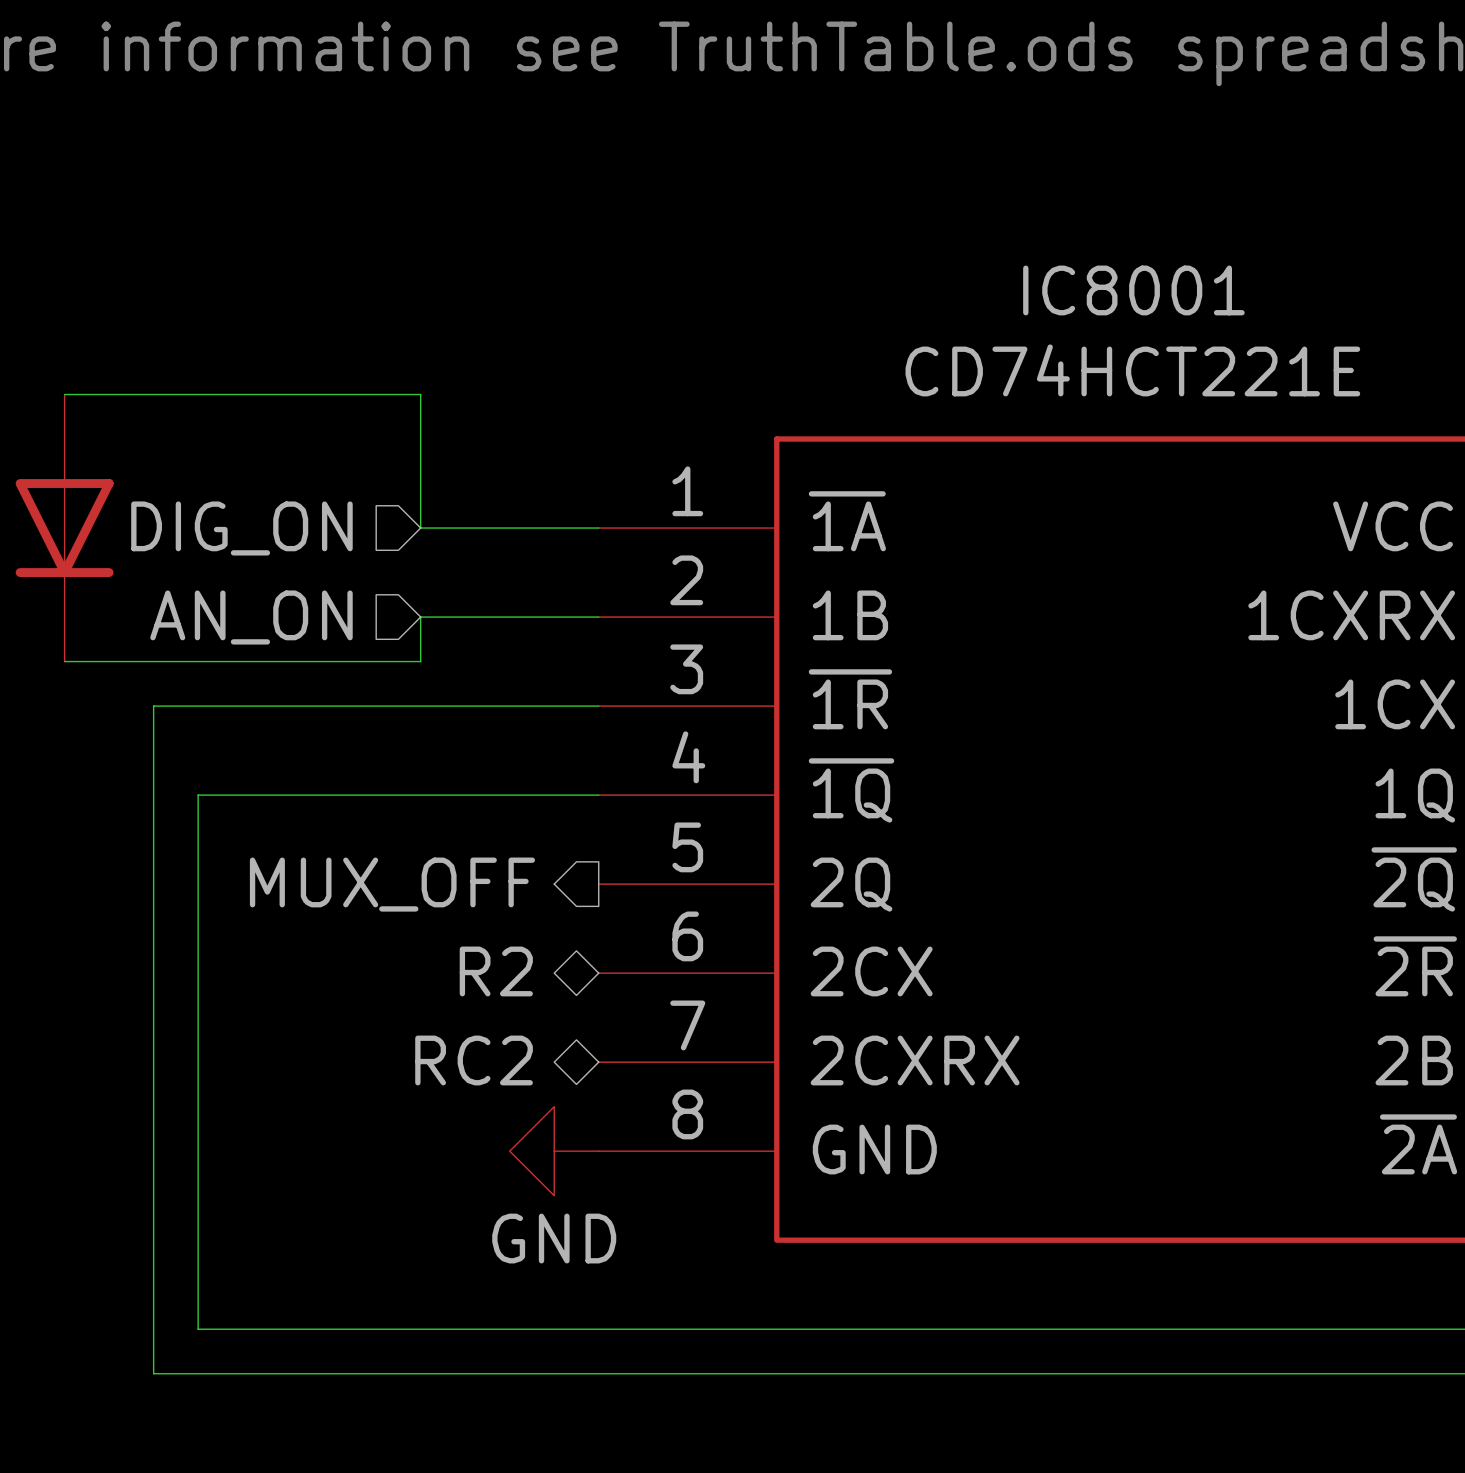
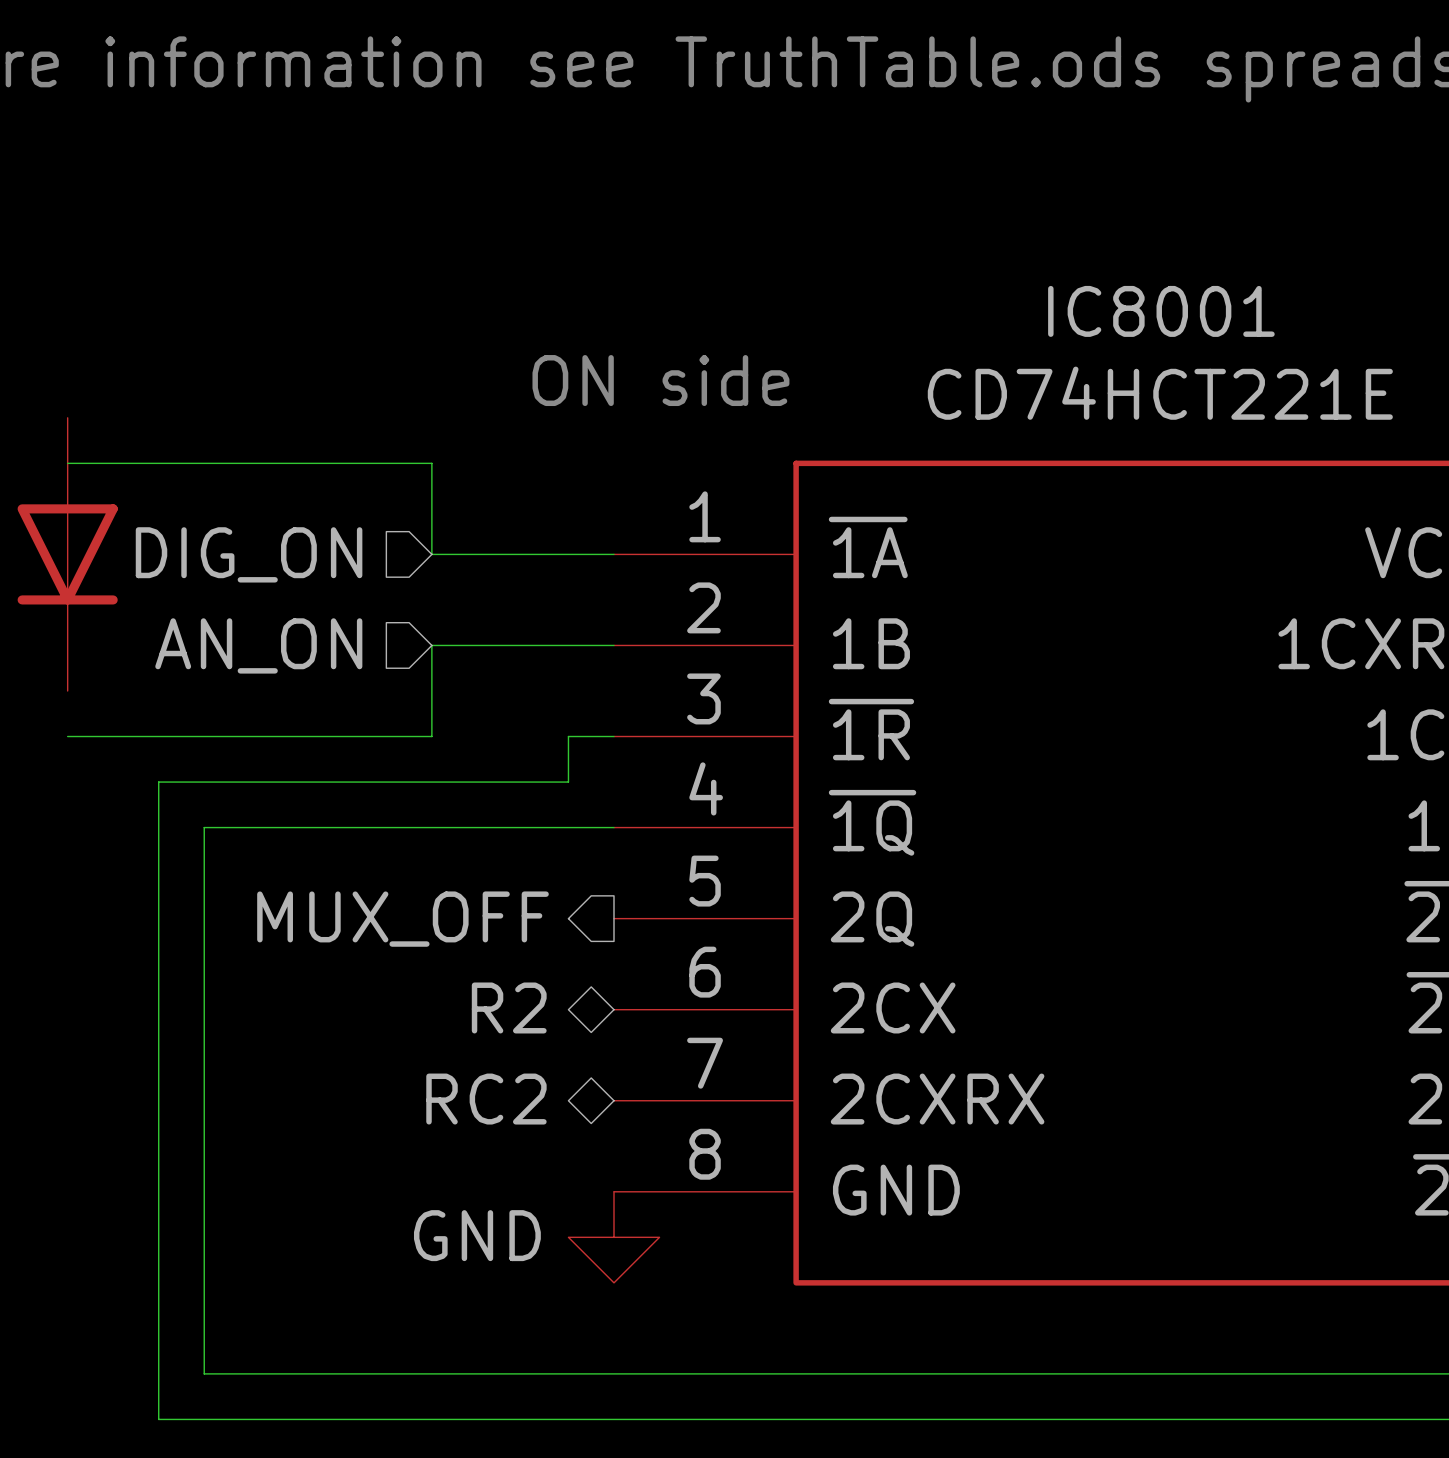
text: none -> ON side (660, 380)
wire: (64, 394) (420, 394) (420, 439) -> (67, 463) (431, 463)
wire: (64, 661) (420, 661) -> none
wire: (153, 706) (153, 750) -> (158, 736) (67, 736)
wire: (420, 706) (554, 706) -> (431, 736) (431, 690)
wire: none -> (568, 736) (568, 782) (158, 782)
power symbol rotation: 0° (554, 1151) -> 90° counterclockwise (613, 1237)
power symbol position: GND (554, 1151) -> GND (613, 1237)
power symbol text position: GND (554, 1238) -> GND (477, 1235)

